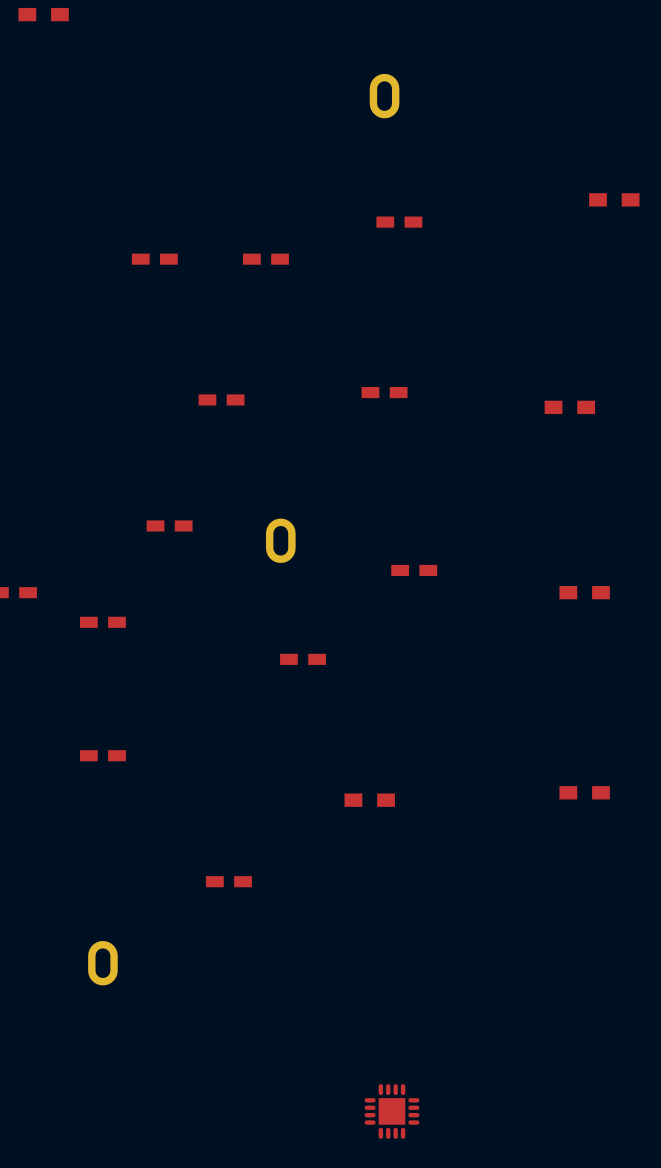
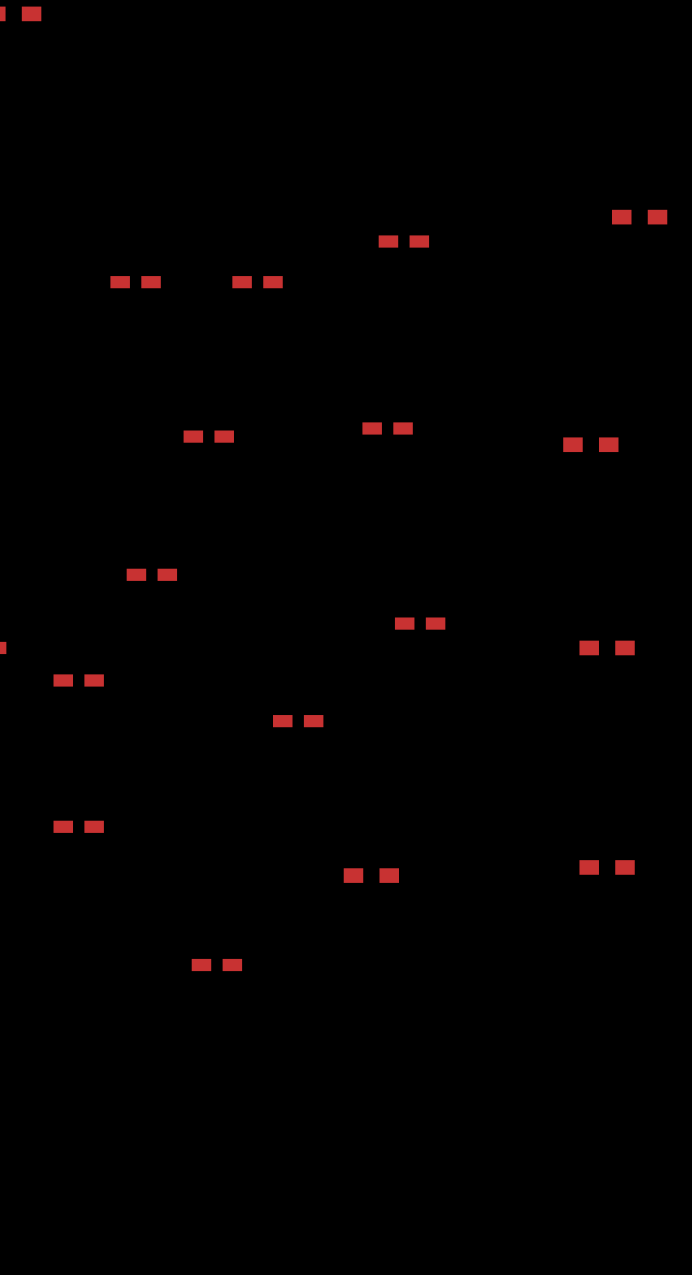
part: (384, 96) -> none
part: (280, 540) -> none
part: (102, 963) -> none
part: (391, 1111) -> none

